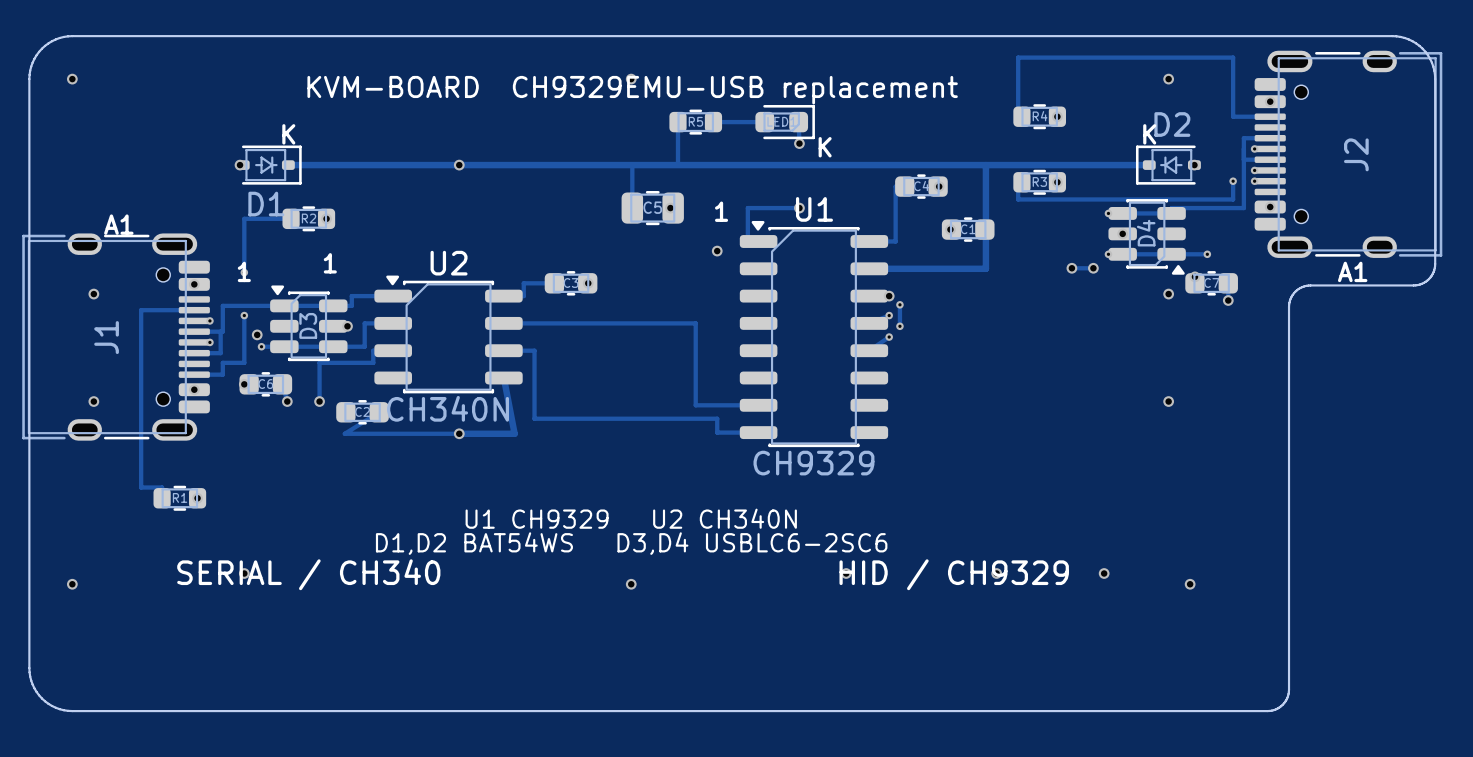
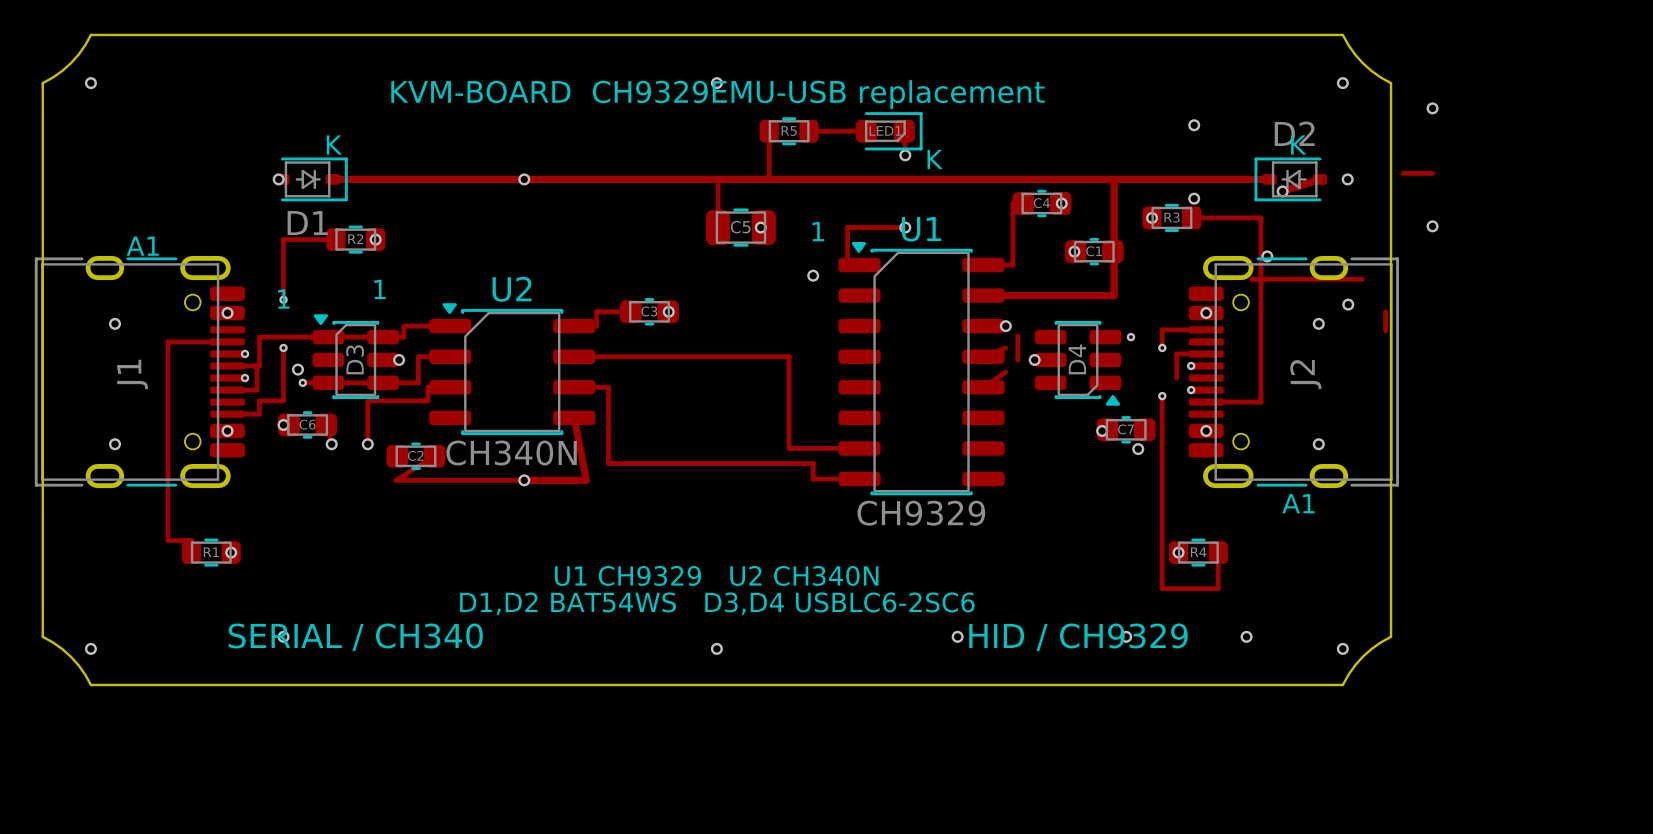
board edge: (72, 36) (55, 39) (41, 48) (32, 62) (29, 79) -> (90, 34) (70, 63) (42, 83)
board edge: (1190, 36) (1400, 36) (1412, 41) (1422, 48) (1431, 62) (1434, 74) (1435, 263) (1431, 275) (1423, 282) (1415, 285) (1306, 285) (1296, 290) (1289, 300) (1289, 689) (1285, 701) (1275, 709) (1267, 711) (68, 710) (55, 707) (45, 701) (36, 691) (31, 680) (29, 668) (29, 573) -> (1342, 34) (1362, 63) (1391, 83) (1391, 636) (1362, 656) (1342, 685) (90, 685) (70, 656) (42, 636)
via position: (1168, 79) -> (1342, 83)
track: (1021, 116) (1018, 116) (1018, 57) (1233, 57) (1233, 116) (1270, 116) -> none
R4 position: (1039, 116) -> (1198, 552)
track: (1270, 138) (1243, 138) (1243, 208) (1171, 208) (1171, 213) (1108, 213) -> none
via: (1254, 148) -> none
J2 position: (1348, 154) -> (1293, 372)
track: (1124, 165) (1150, 165) -> none
D2 position: (1168, 165) -> (1290, 179)
track: none -> (1319, 179) (1282, 191)
via: (1254, 170) -> none
via: none -> (1282, 191)
track: (1233, 181) (1233, 199) (1117, 199) -> (1206, 402) (1261, 402) (1261, 217)
via: (1233, 181) -> none
via: (1254, 181) -> none
track: (1021, 182) (1018, 182) (1018, 199) (1055, 199) -> none
R3 position: (1039, 182) -> (1171, 217)
via: none -> (1152, 217)
via: (1108, 213) -> none
D4 position: (1147, 236) -> (1078, 363)
via: (1108, 254) -> none
via: (1207, 254) -> none
track: (1071, 268) (1093, 268) -> none
via: (1071, 268) -> none
via: (1093, 268) -> none
text position: A1 (1352, 271) -> A1 (1298, 503)
C7 position: (1211, 283) -> (1126, 429)
via: none -> (1206, 313)
track: none -> (1206, 329) (1162, 329) (1162, 347)
via: (1228, 300) -> none
via: (899, 304) -> none
via: none -> (1130, 337)
via: (889, 315) -> none
via: none -> (1162, 347)
track: none -> (1206, 353) (1176, 353) (1176, 378)
via: (899, 326) -> none
via: none -> (1034, 359)
via: none -> (1191, 366)
via: (889, 337) -> none
via: none -> (1191, 390)
track: none -> (1162, 396) (1162, 588) (1218, 588) (1218, 552)
via: none -> (1162, 396)
via: none -> (1102, 431)
via: none -> (1206, 431)
via: none -> (1138, 449)
via: none -> (1178, 552)

